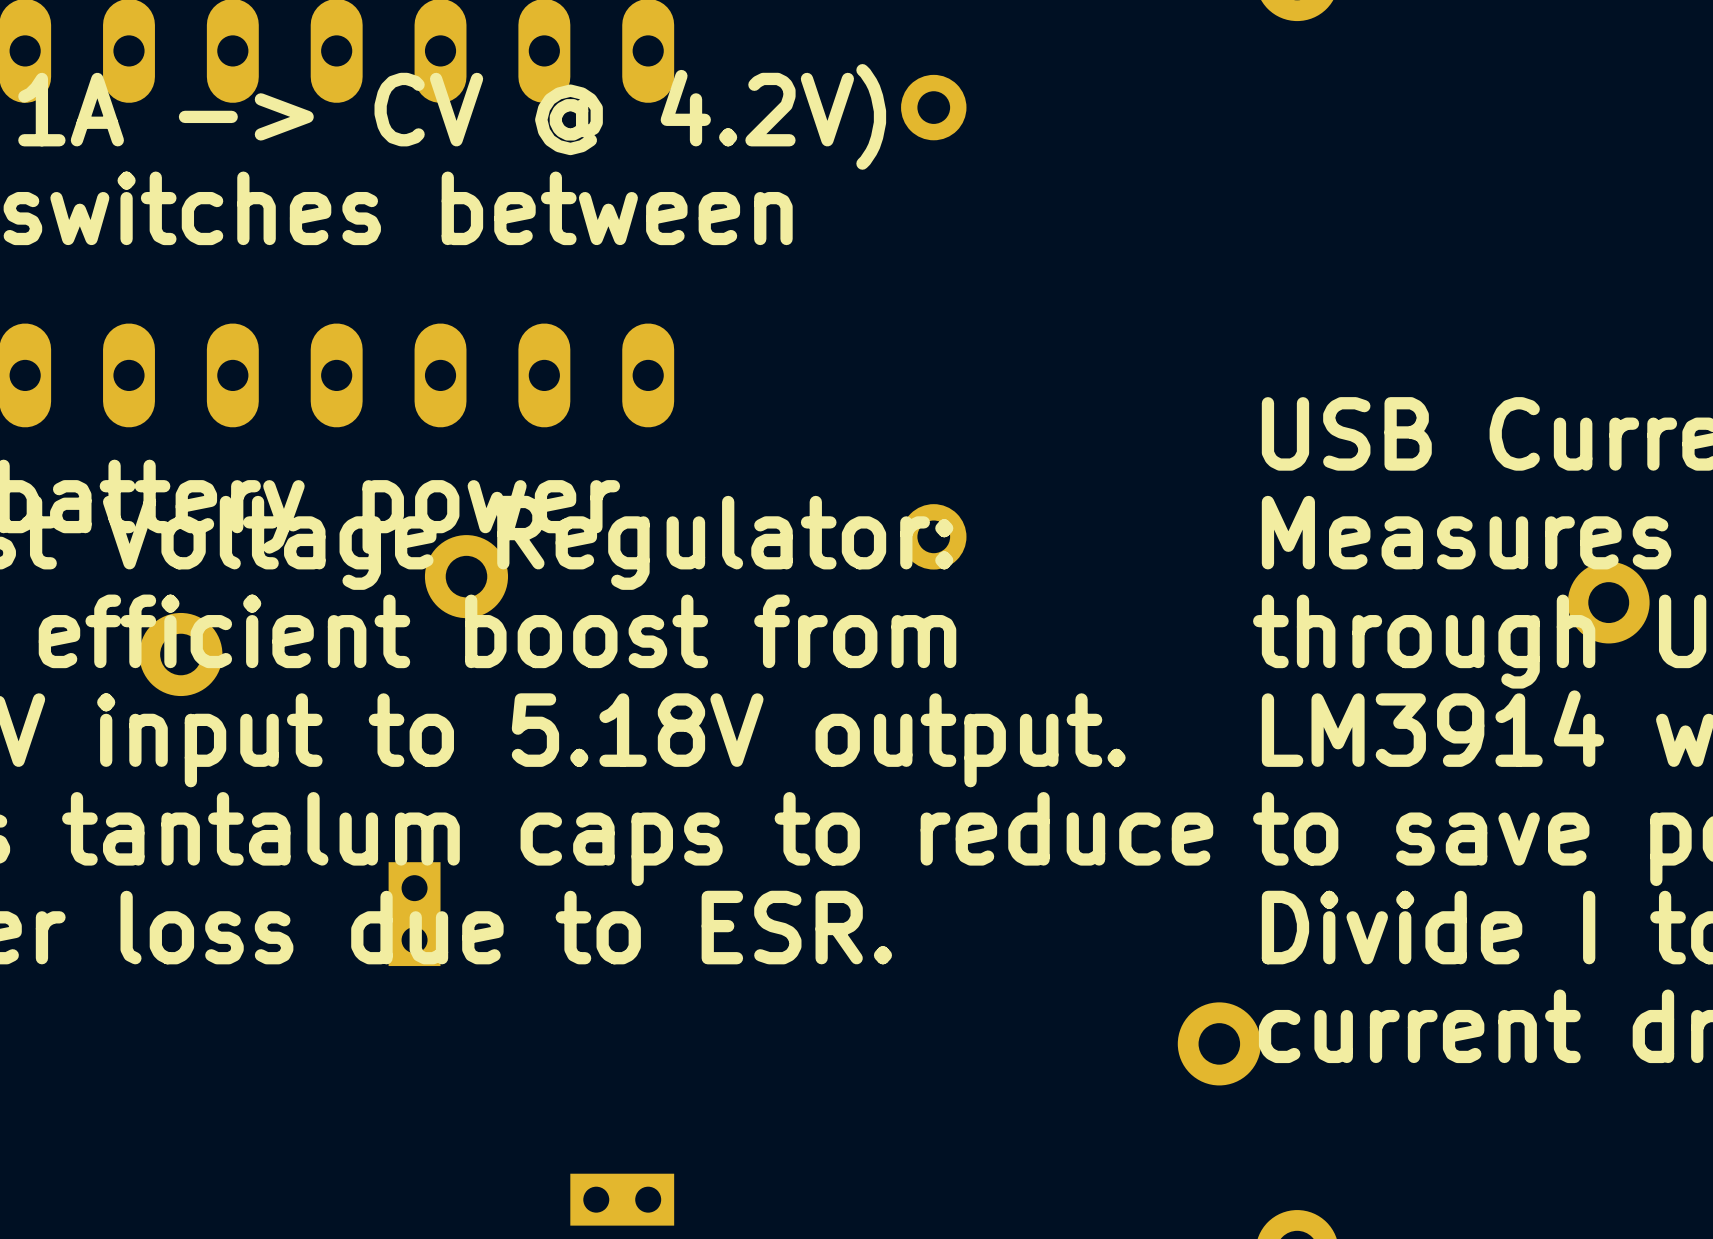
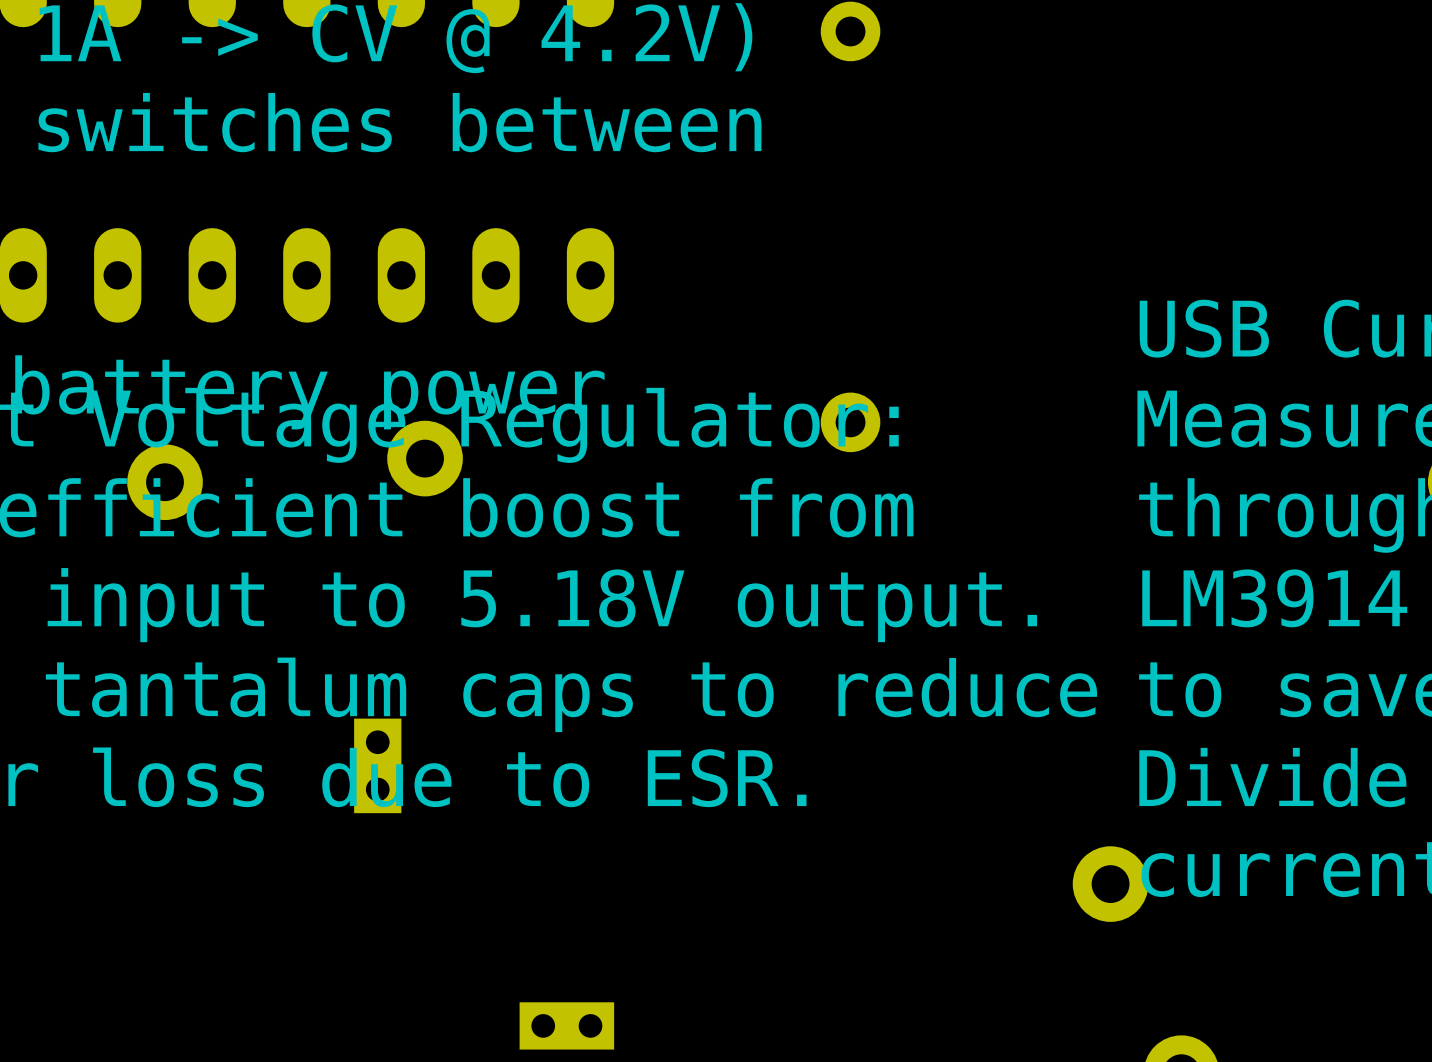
part position: (180, 654) -> (165, 482)

